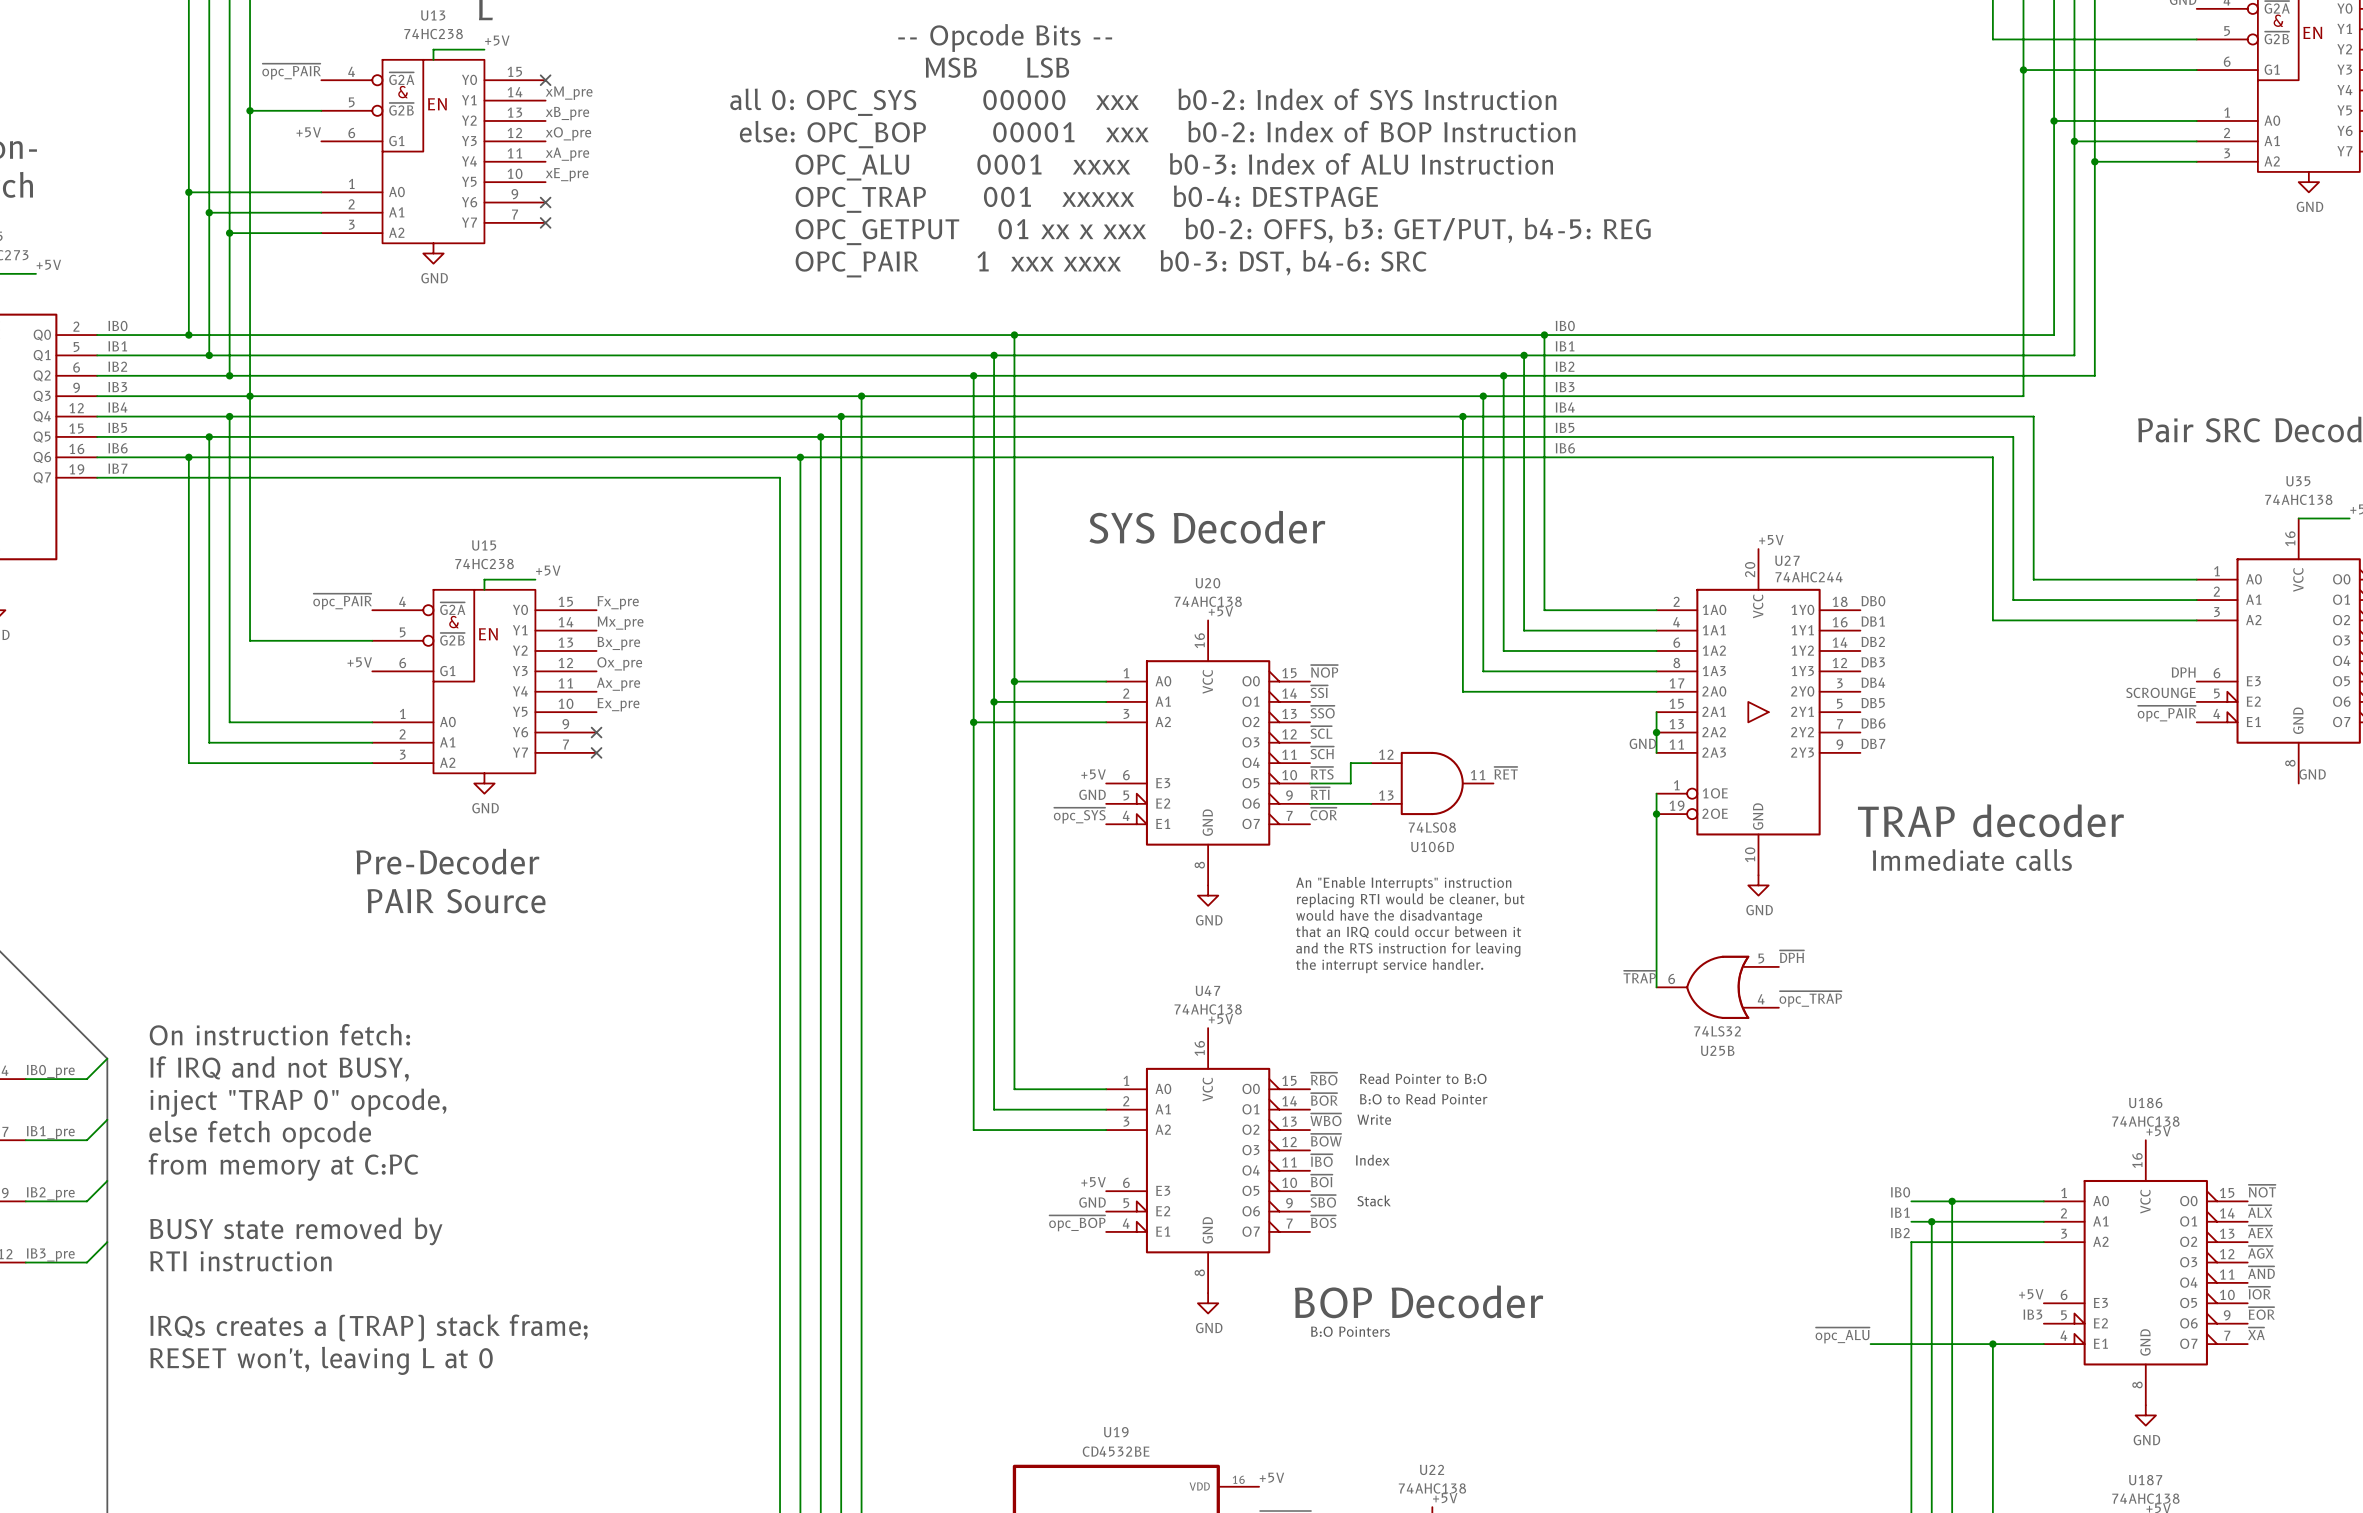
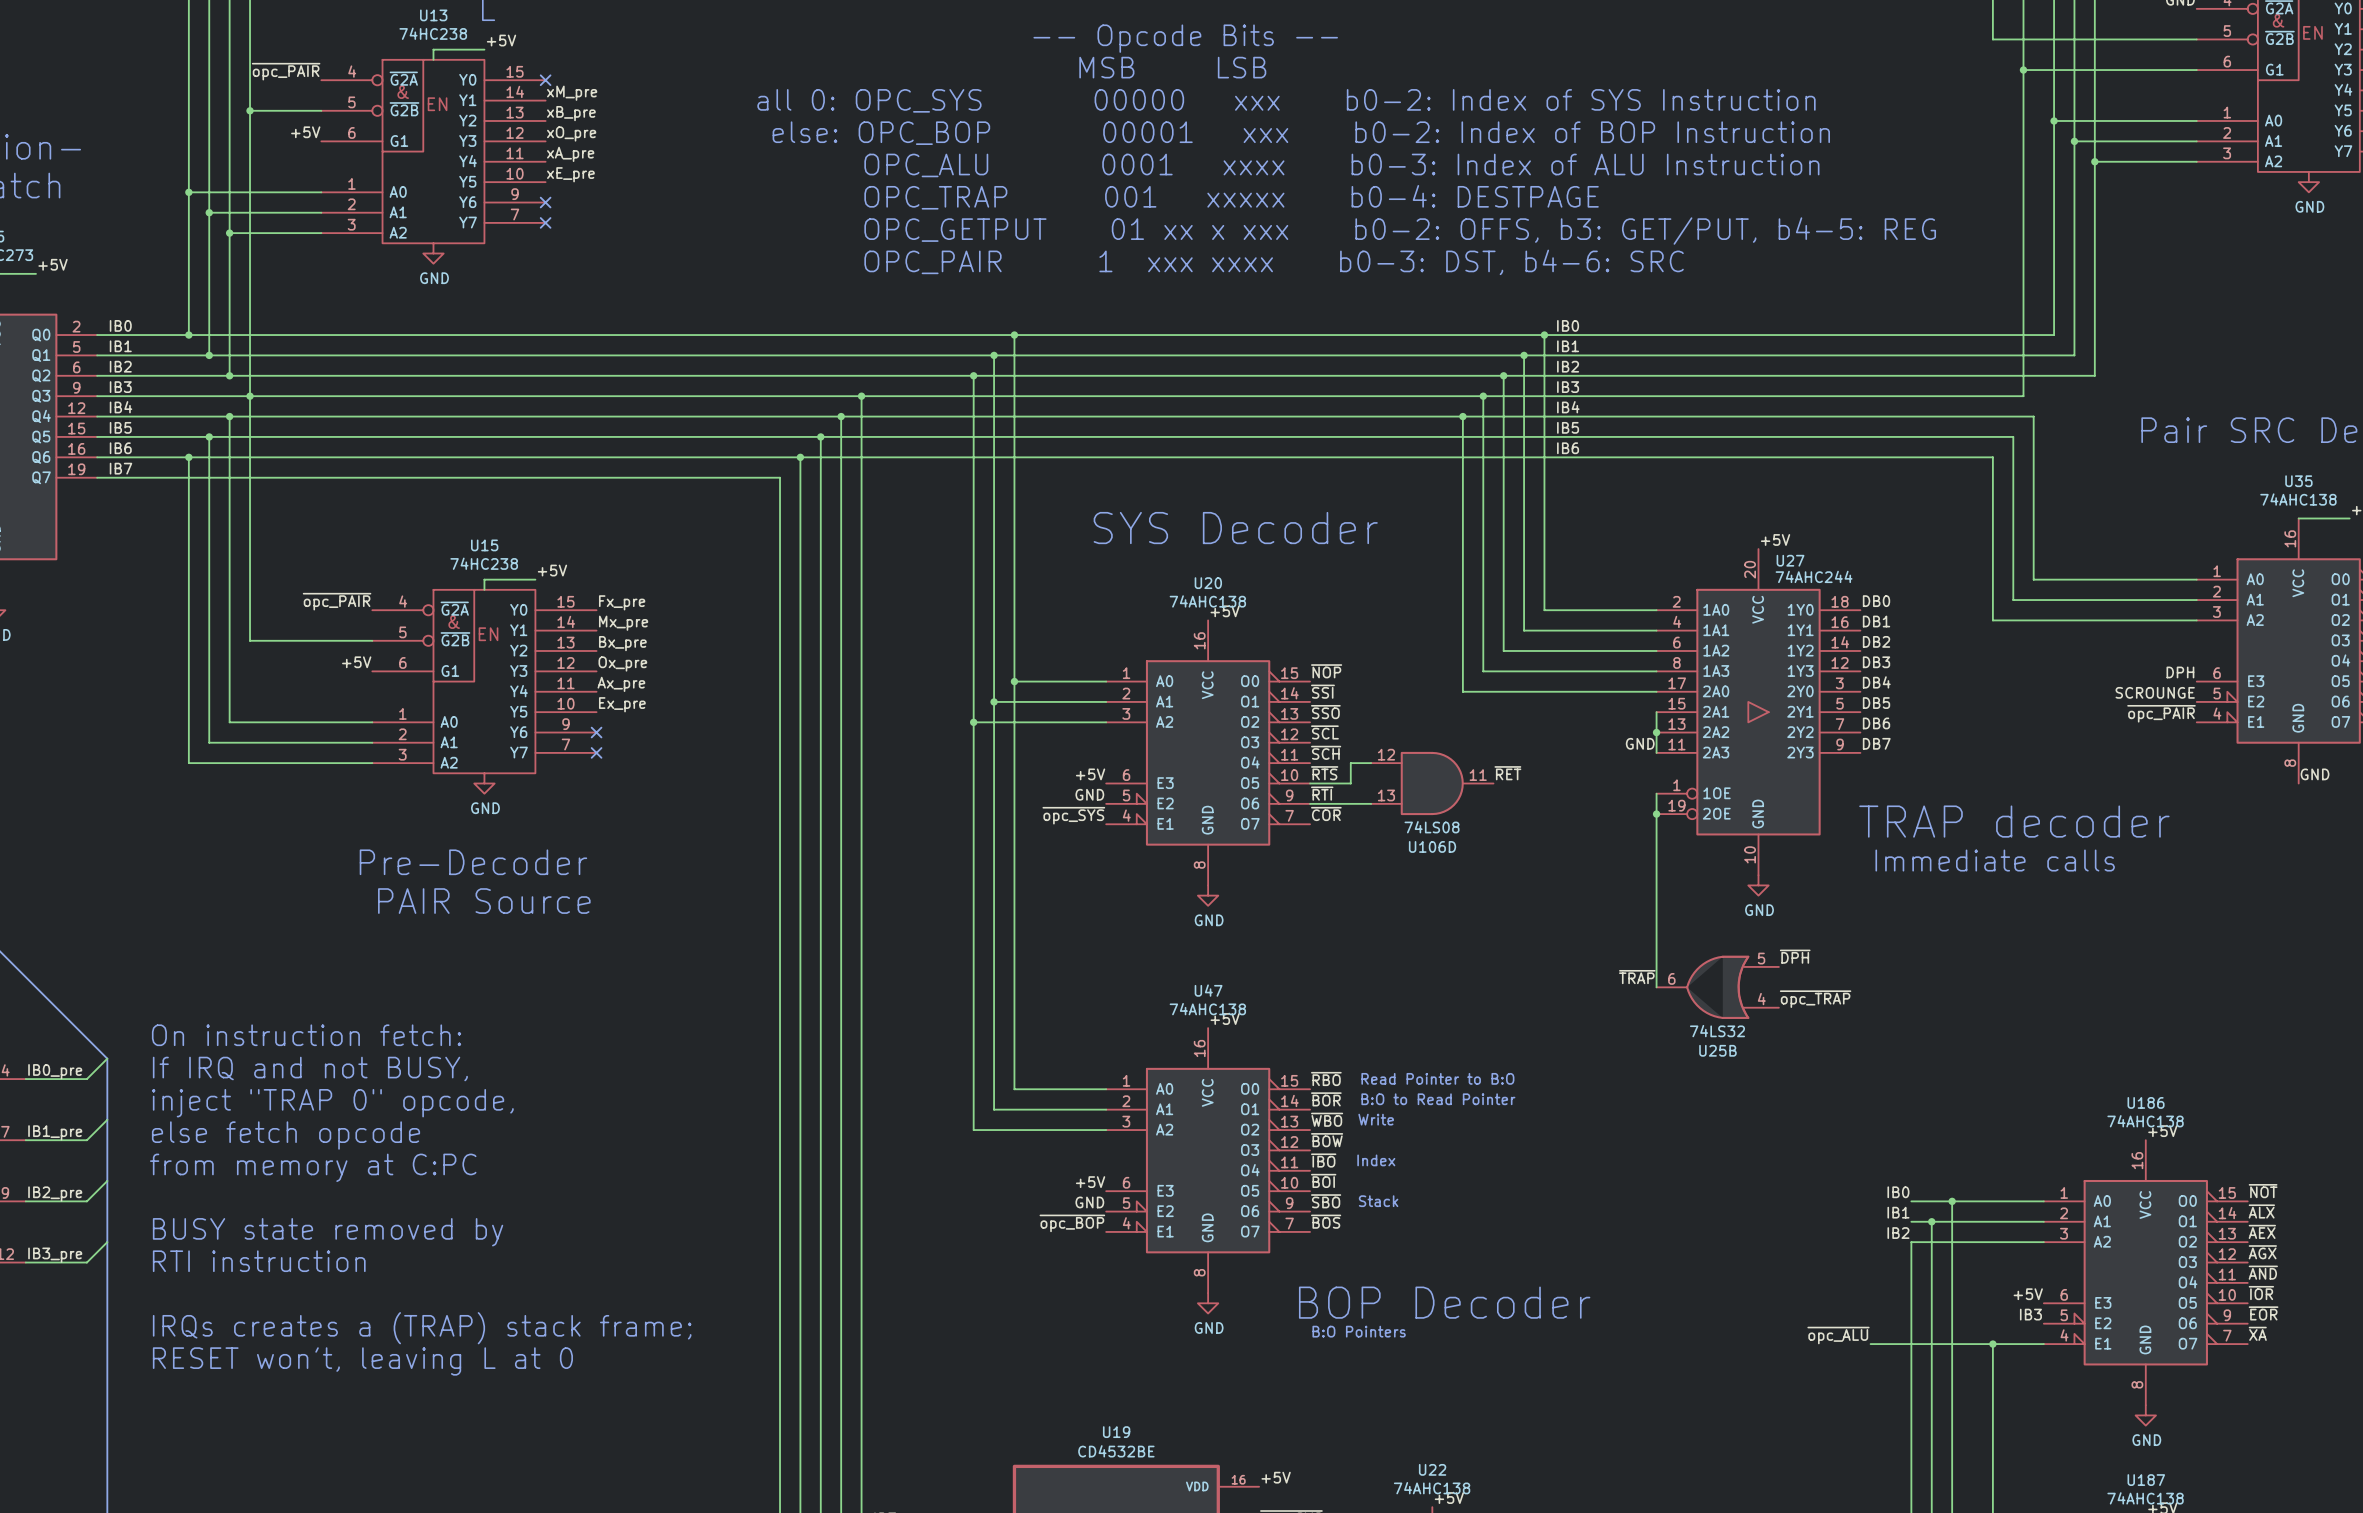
text: An "Enable Interrupts" instruction (1403, 884) -> none
text: replacing RTI would be cleaner, but (1410, 900) -> none
text: would have the disadvantage (1389, 916) -> none
text: that an IRQ could occur between it (1408, 932) -> none
text: and the RTS instruction for leaving (1408, 949) -> none
text: the interrupt service handler. (1389, 966) -> none

